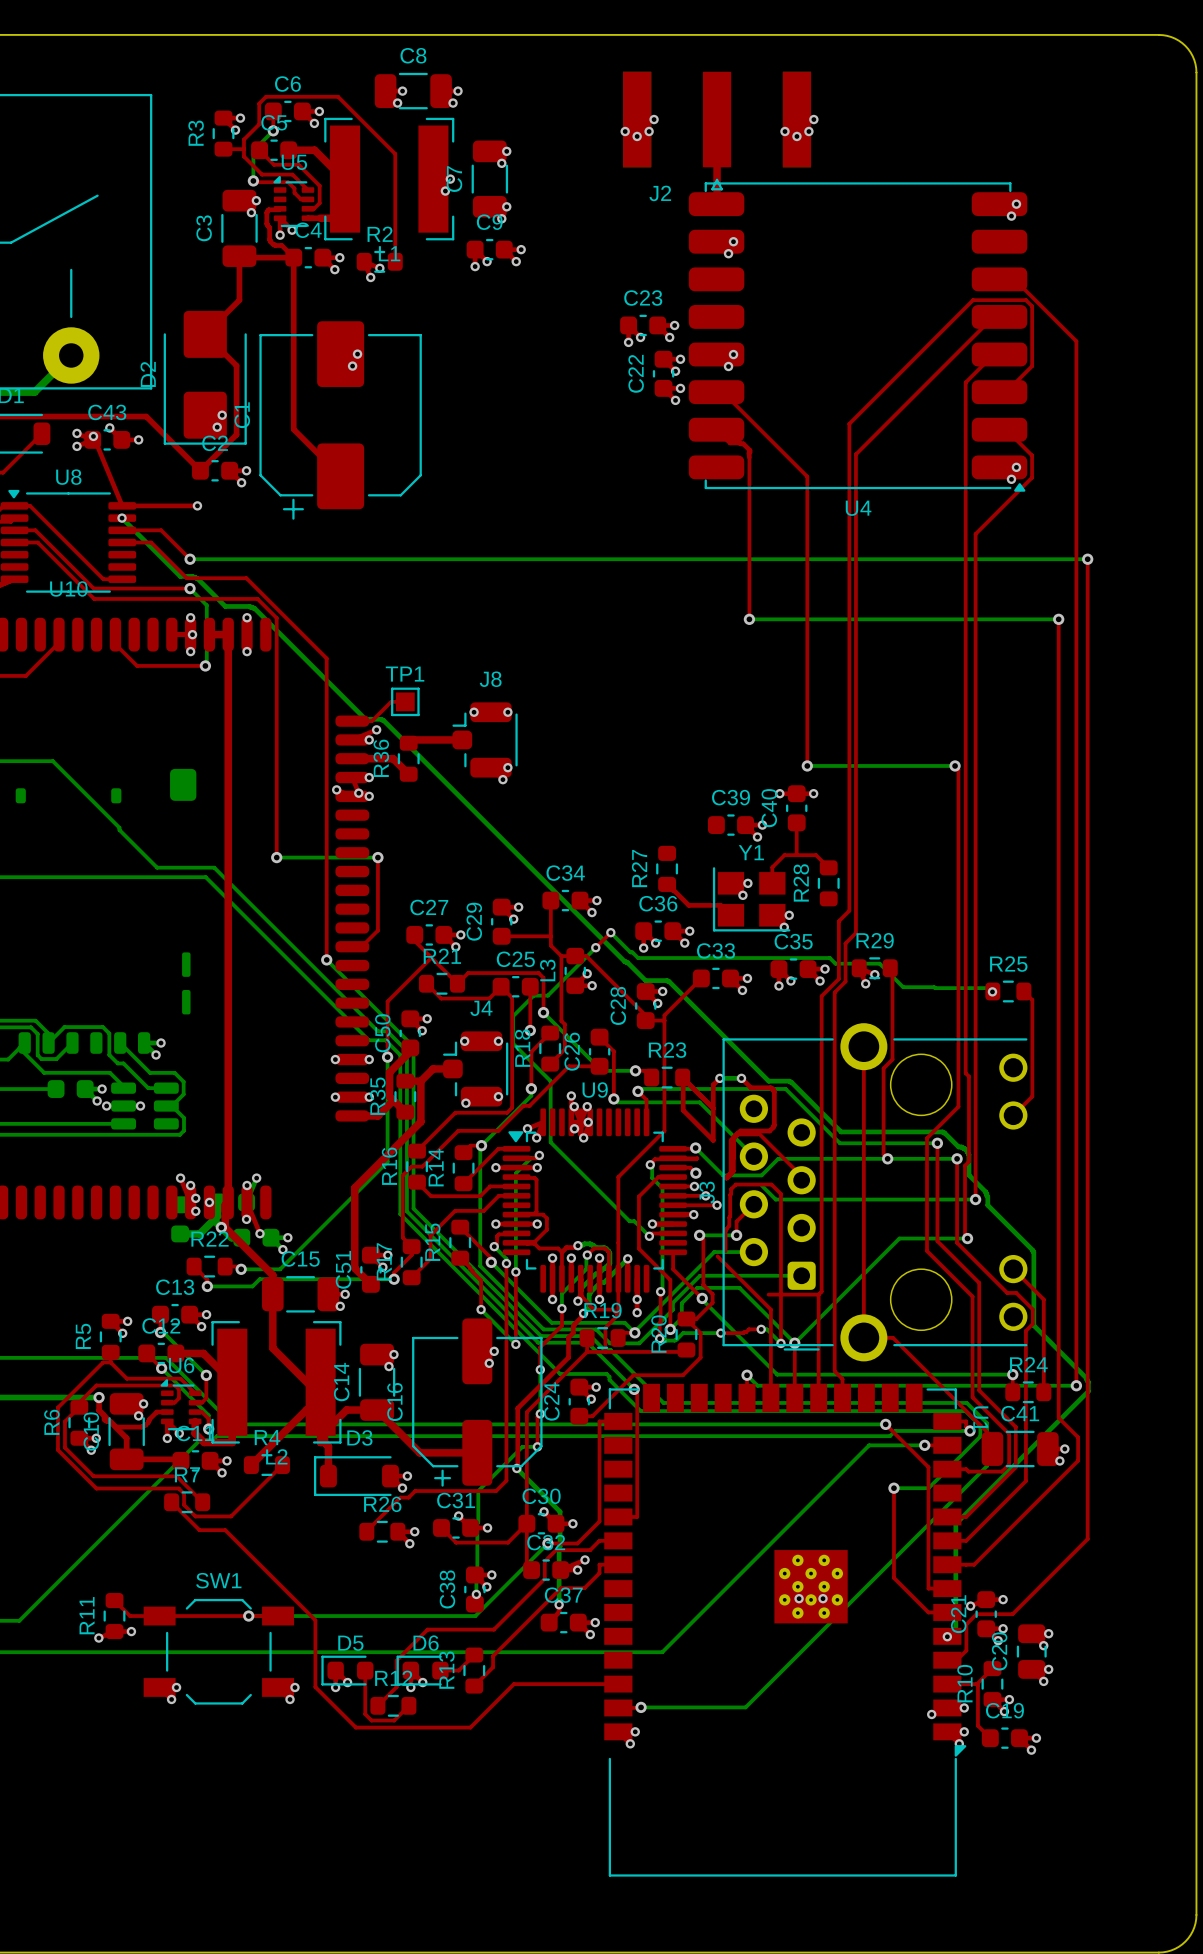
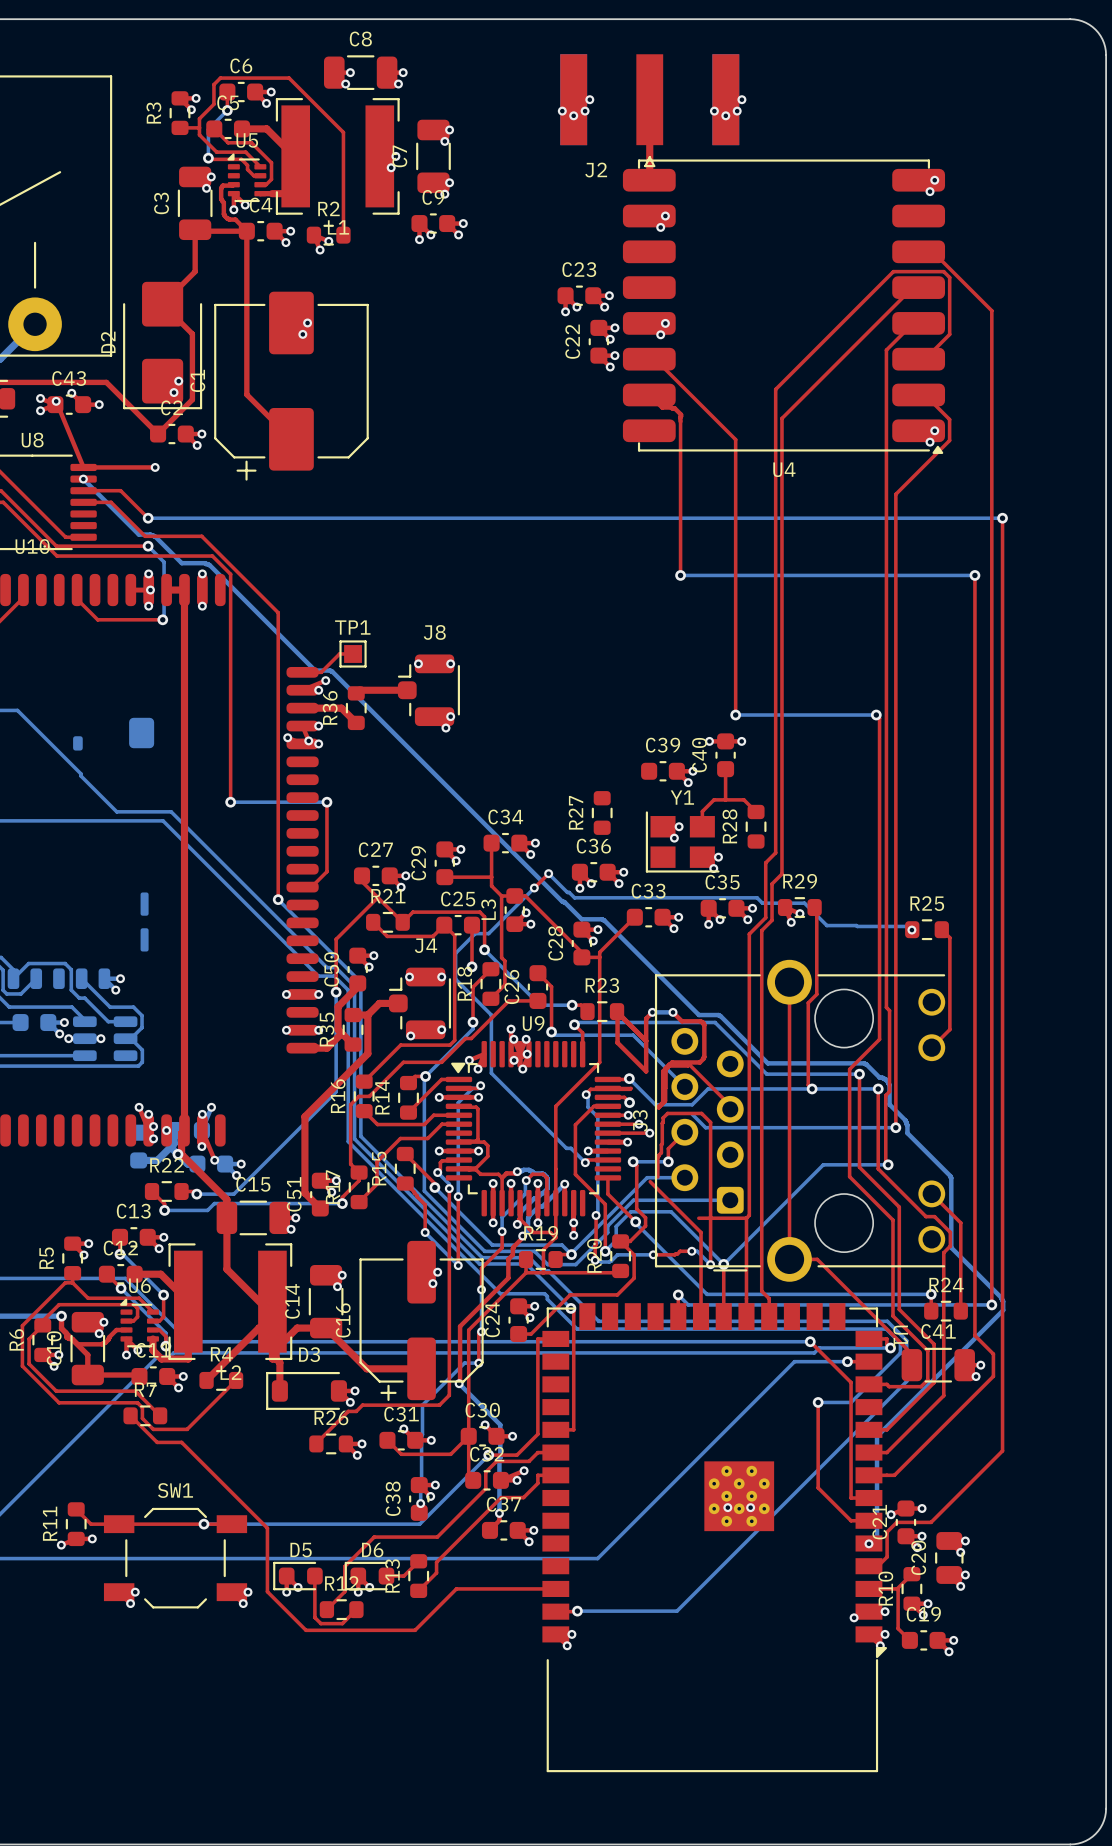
top track: (667, 884) (688, 905) (720, 905) (730, 915) -> none

